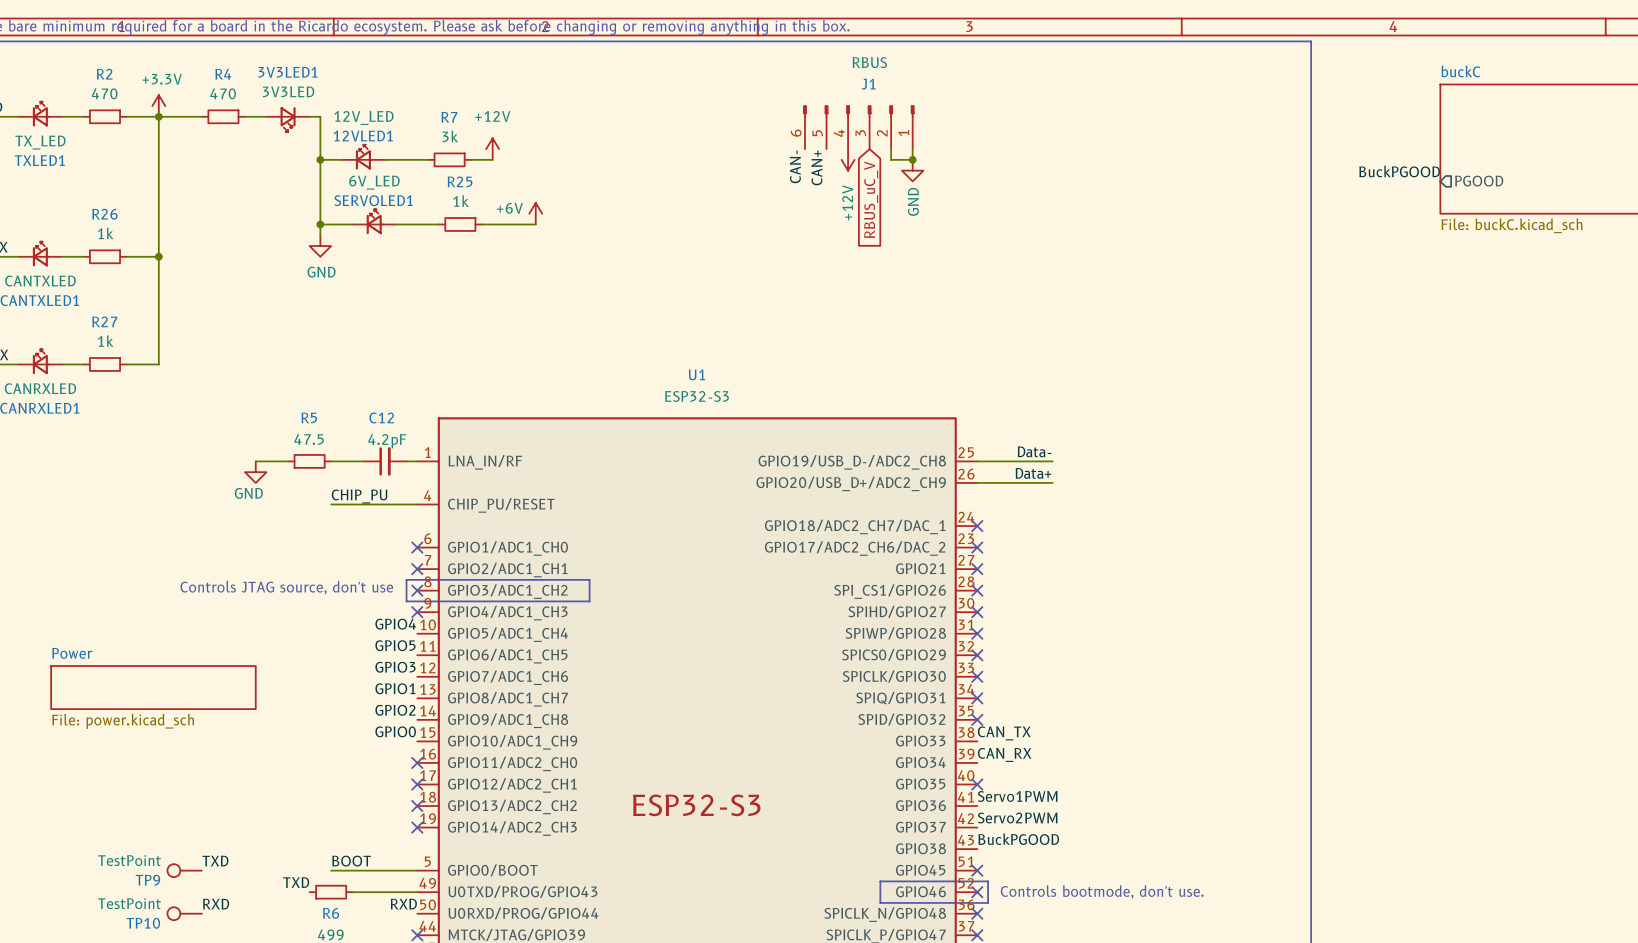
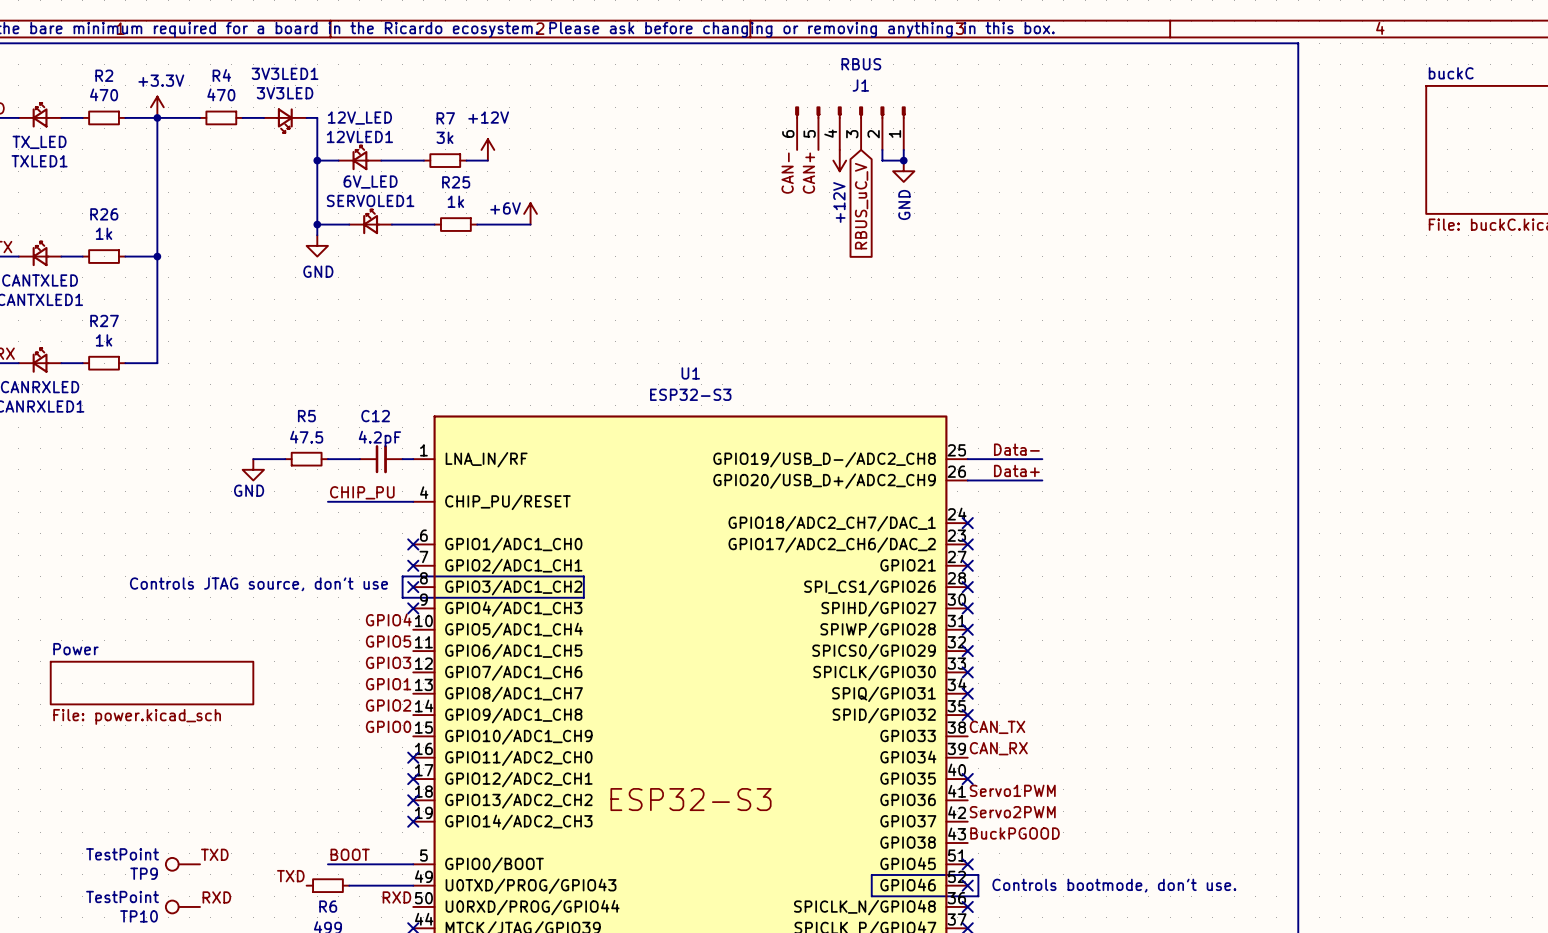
label: BuckPGOOD (1399, 171) -> none
sheet pin: PGOOD (1479, 181) -> none

